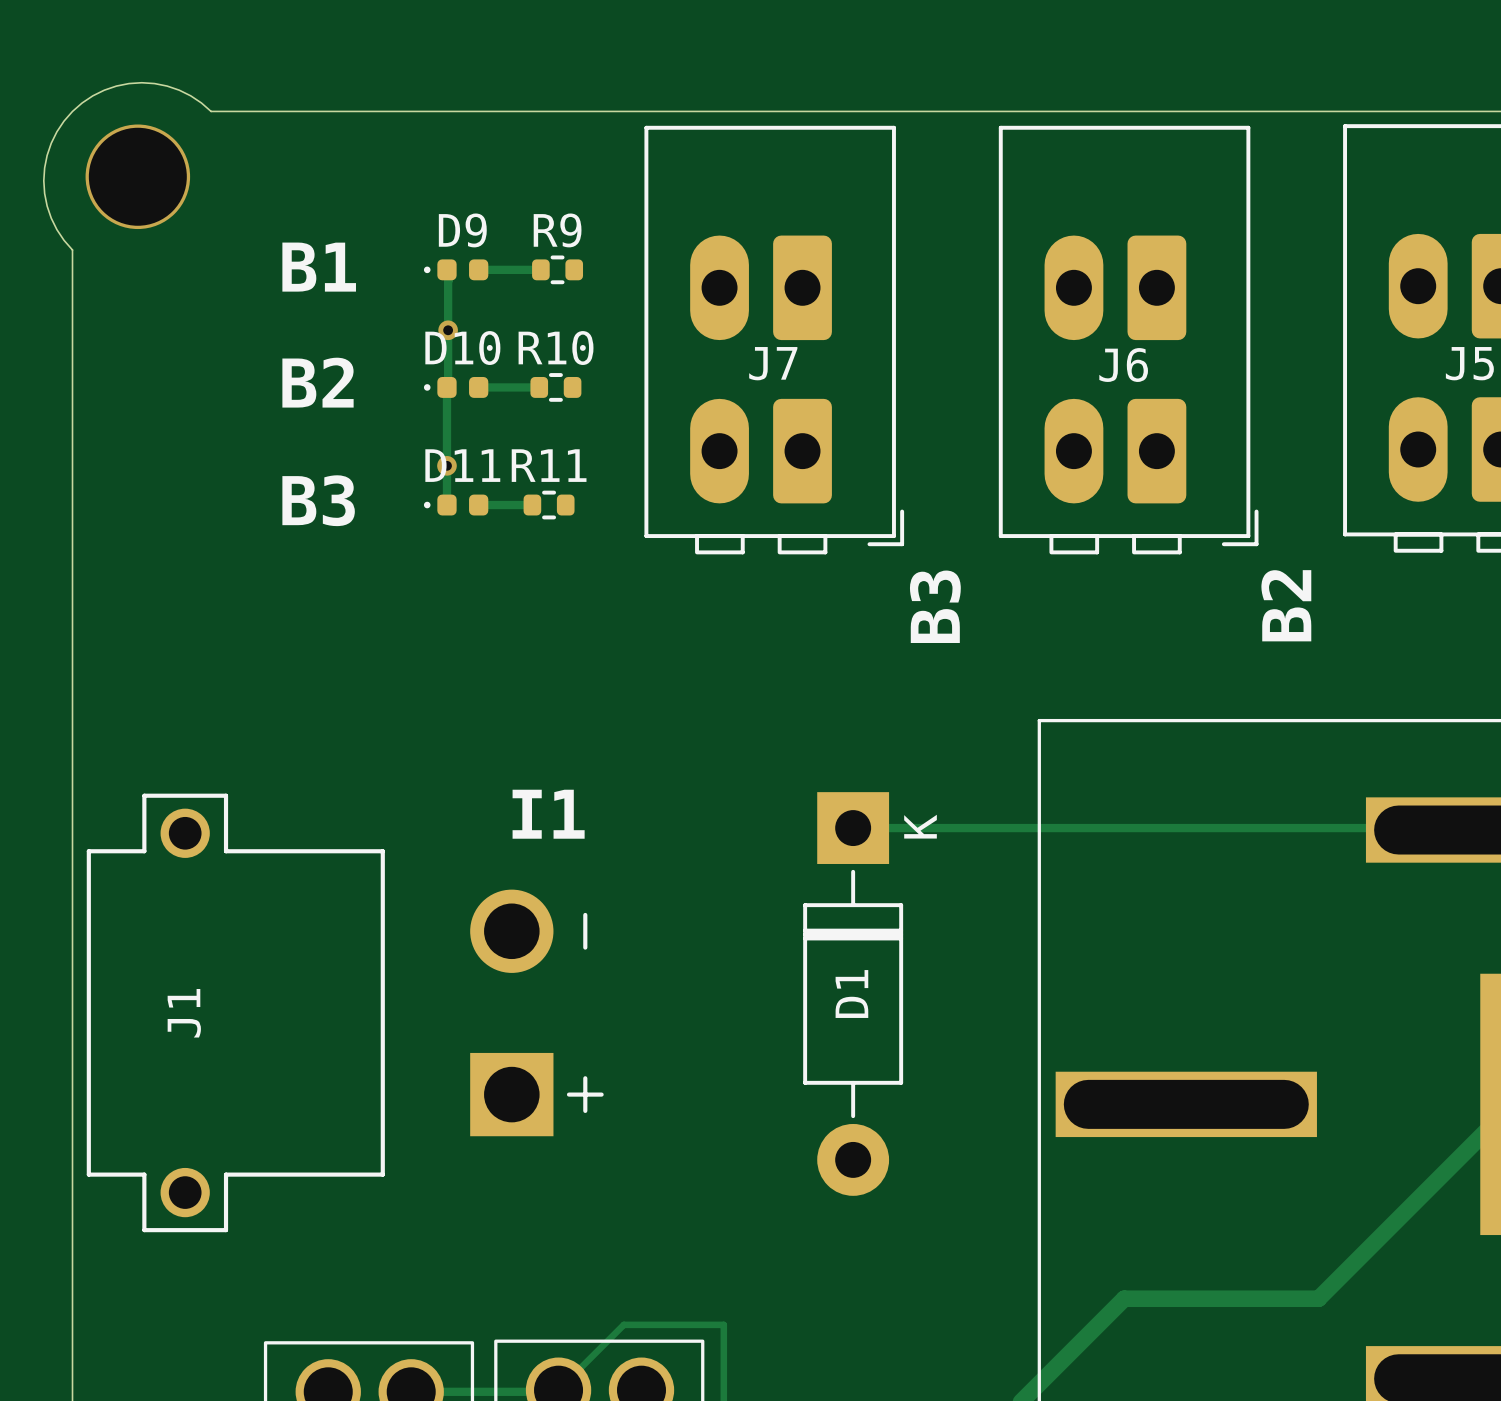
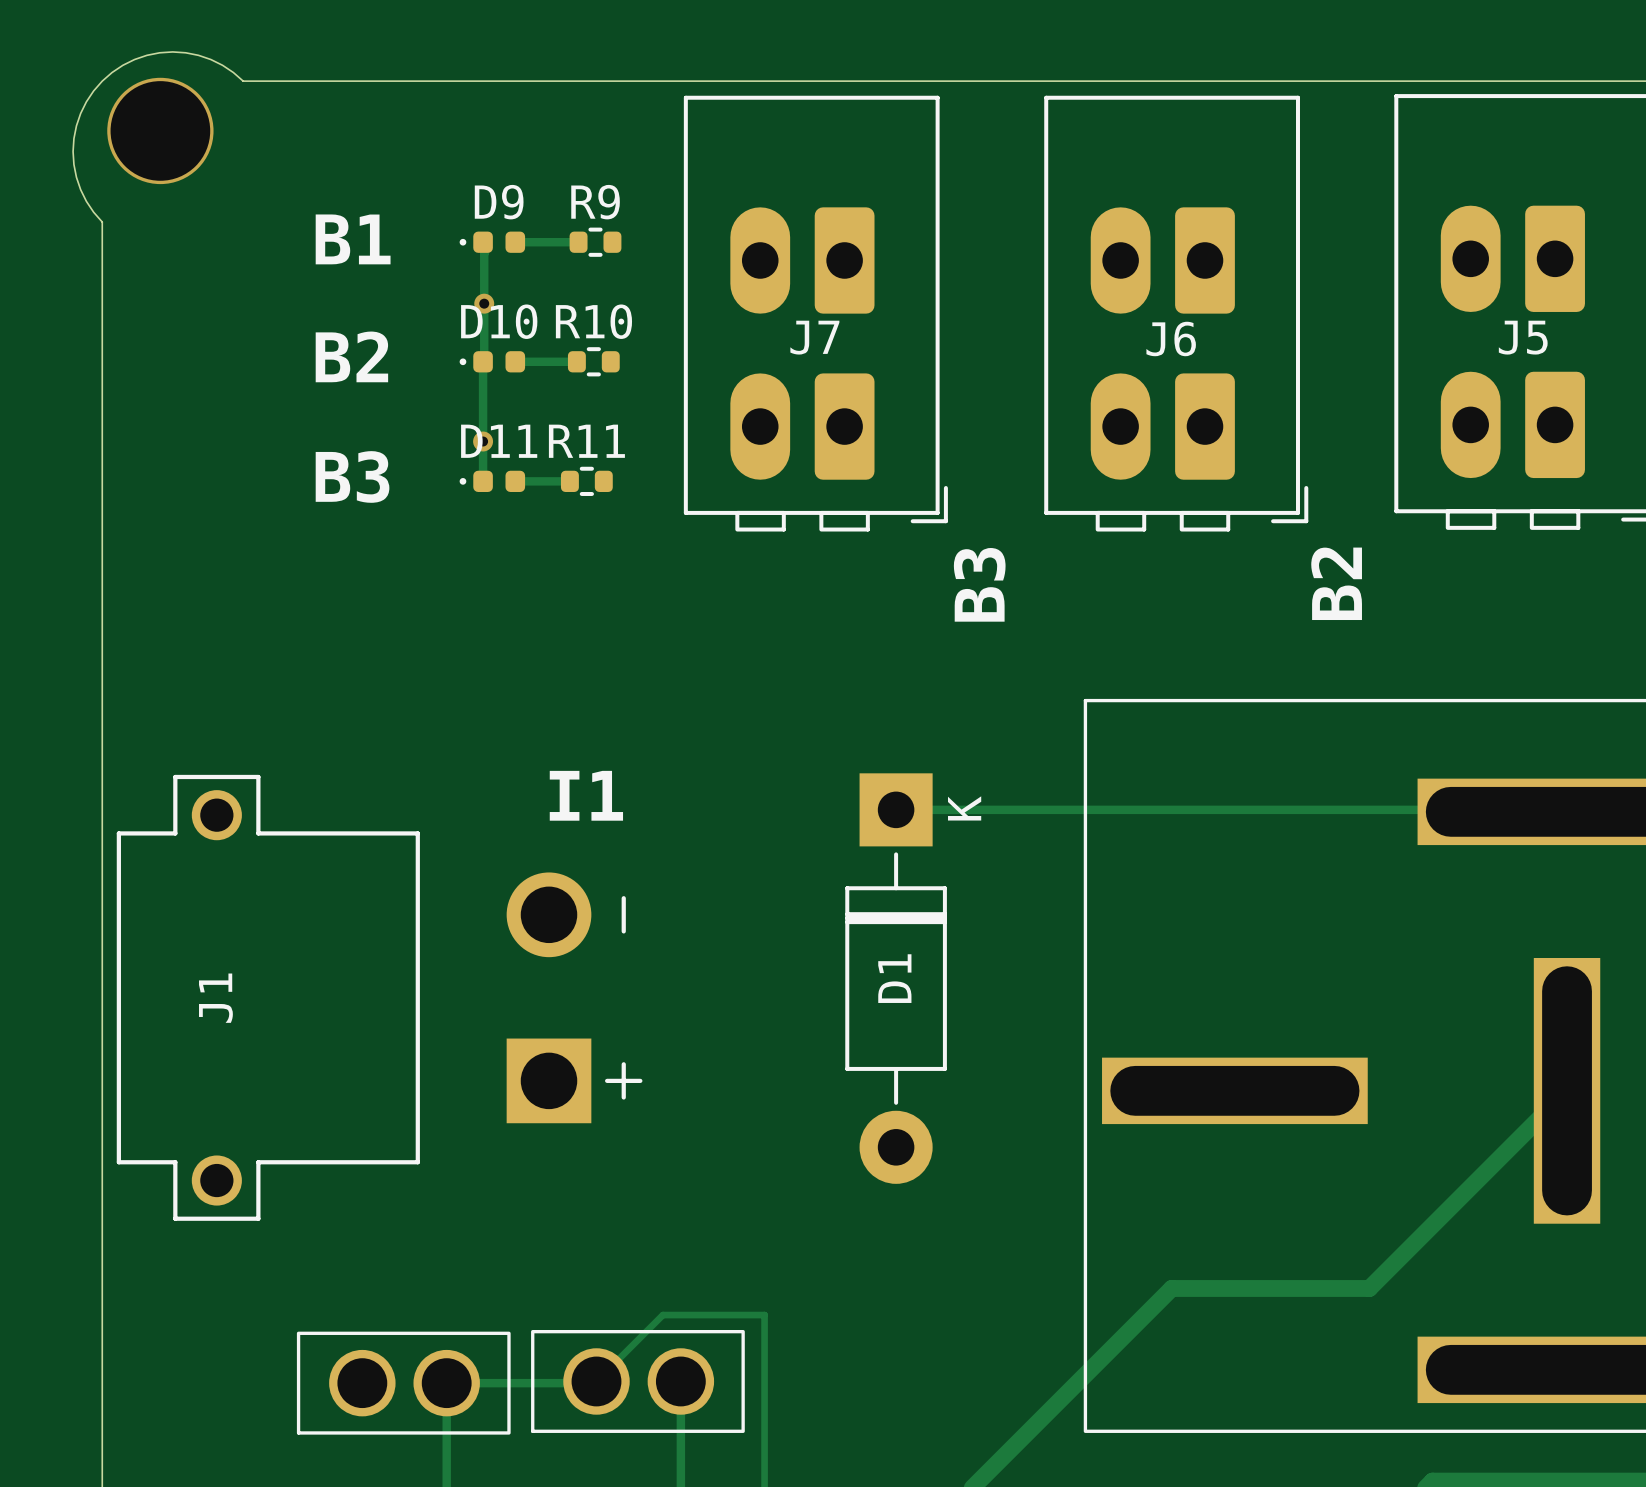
via position: (137, 176) -> (160, 130)

